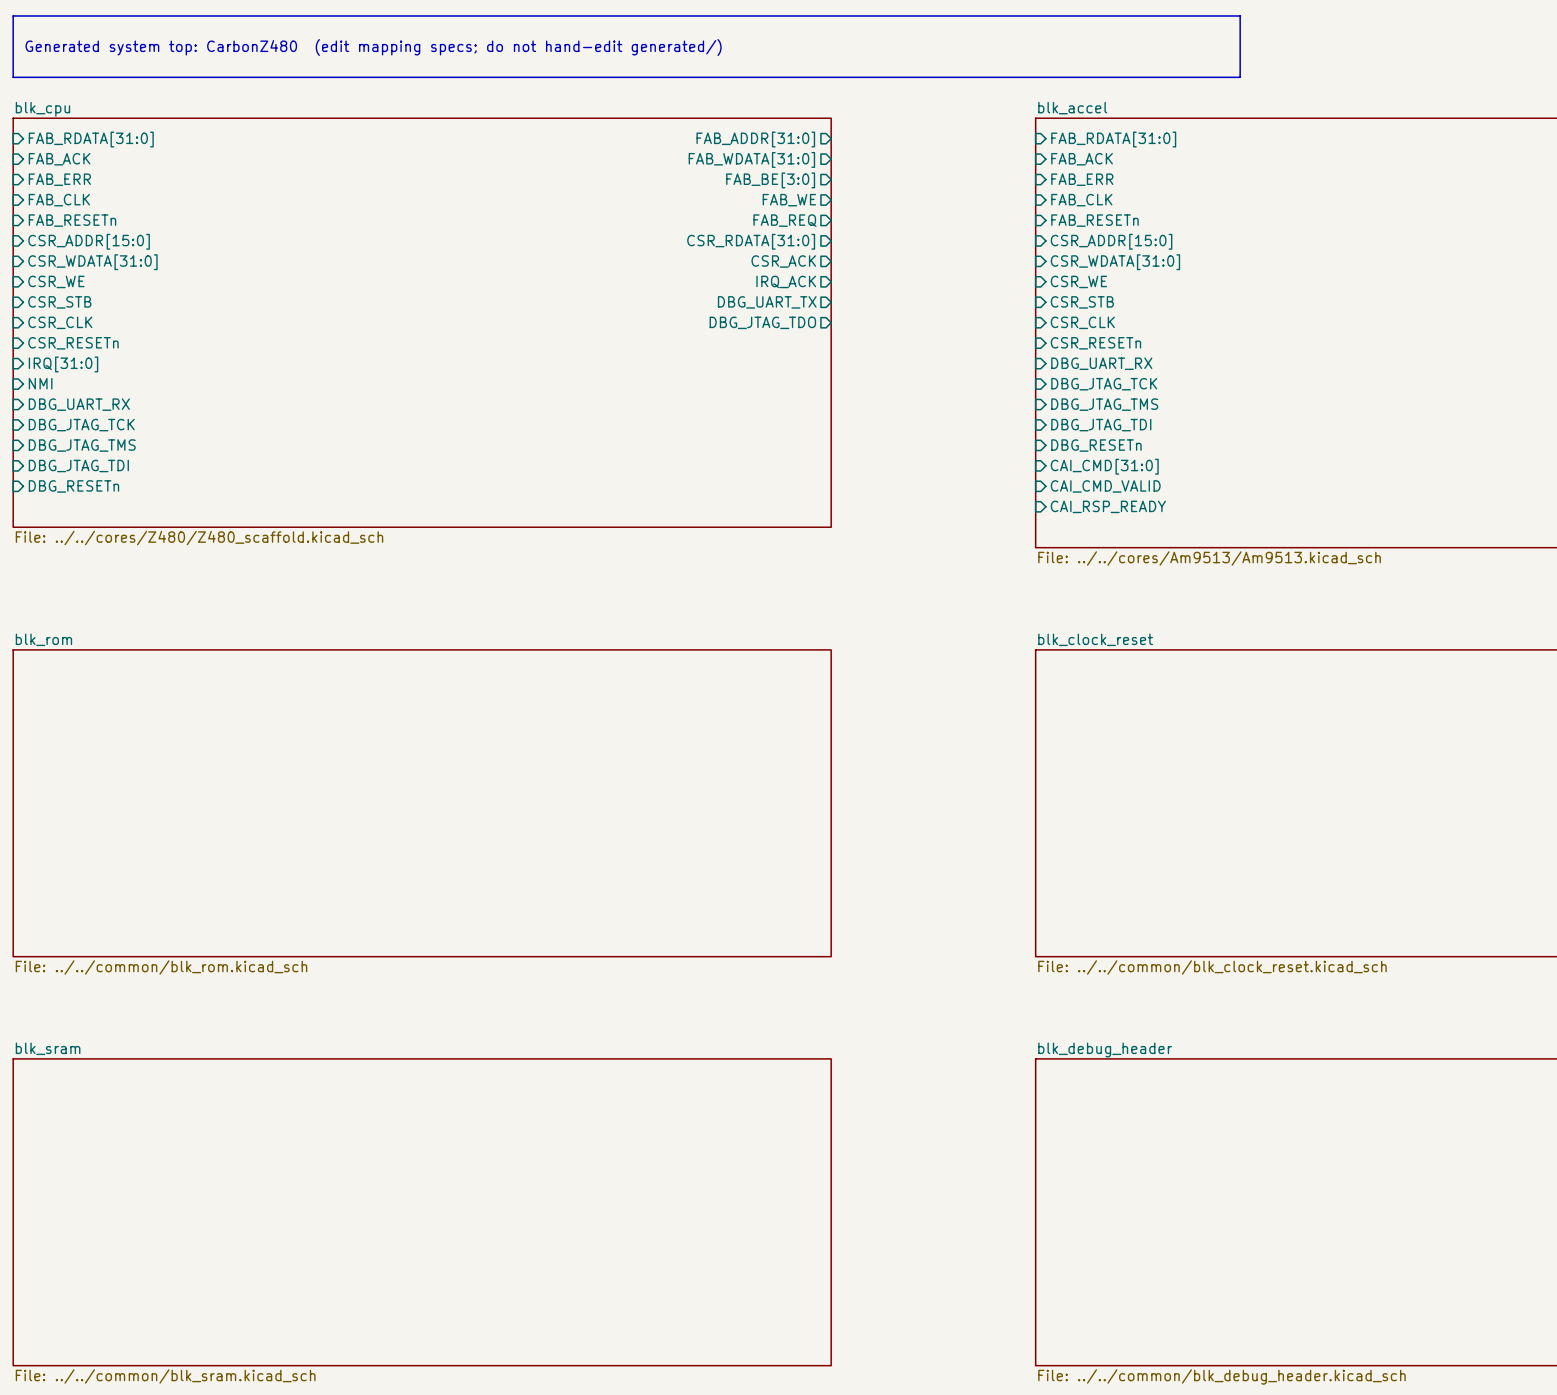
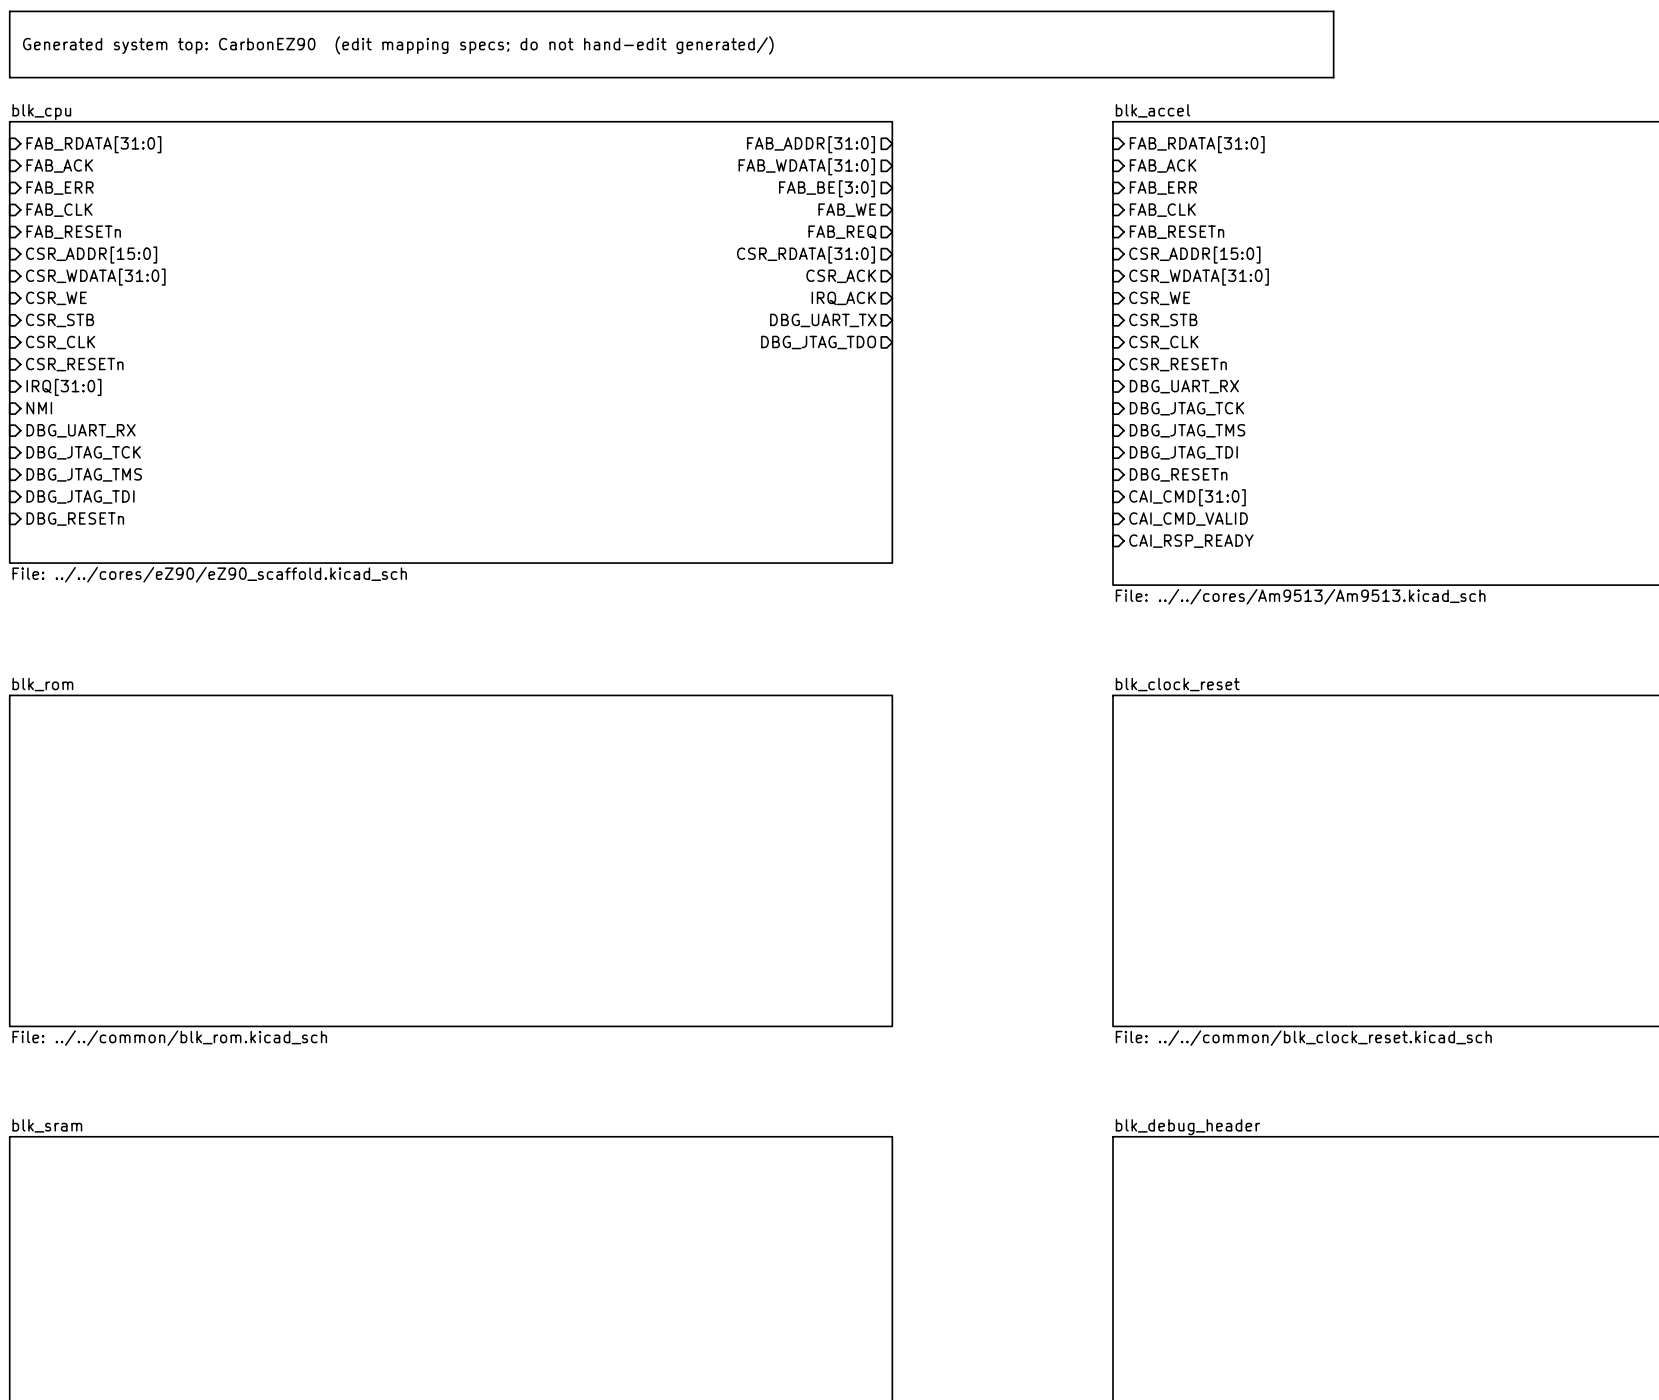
text: Generated system top: CarbonZ480 (edit mapping specs; do not hand-edit generated/) (373, 47) -> Generated system top: CarbonEZ90 (edit mapping specs; do not hand-edit generated/) (398, 45)
sheet blk_cpu value: File: ../../cores/Z480/Z480_scaffold.kicad_sch (199, 538) -> File: ../../cores/eZ90/eZ90_scaffold.kicad_sch (209, 574)

